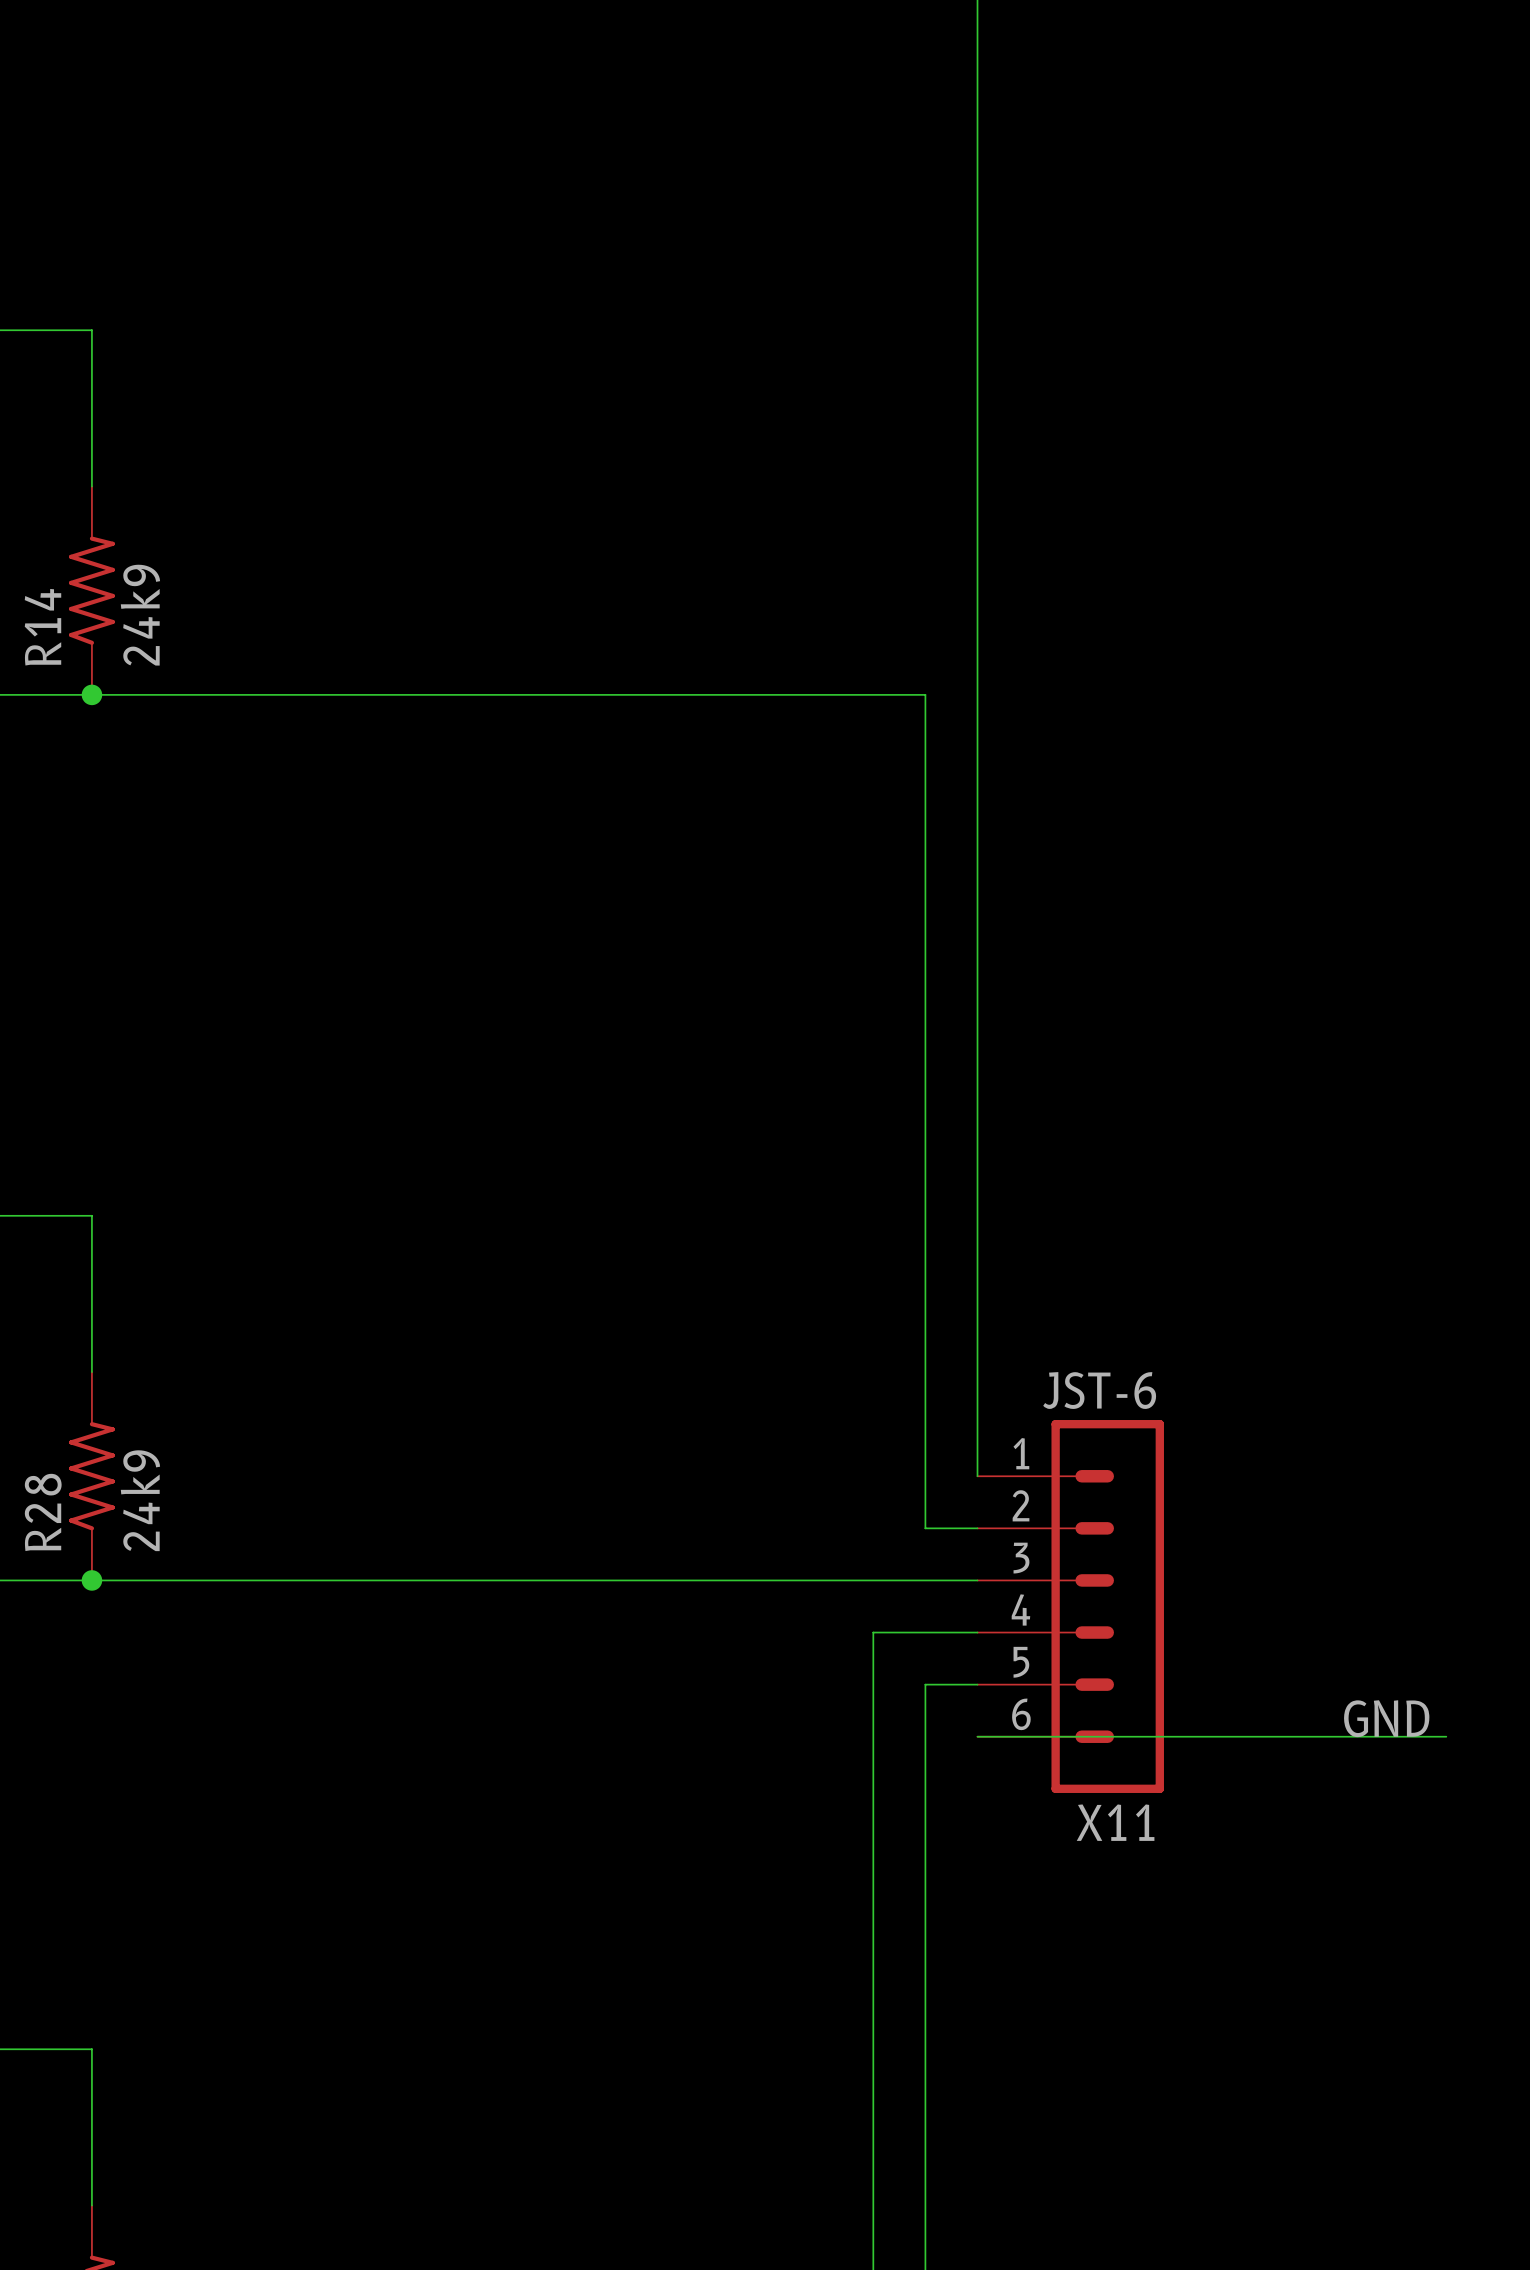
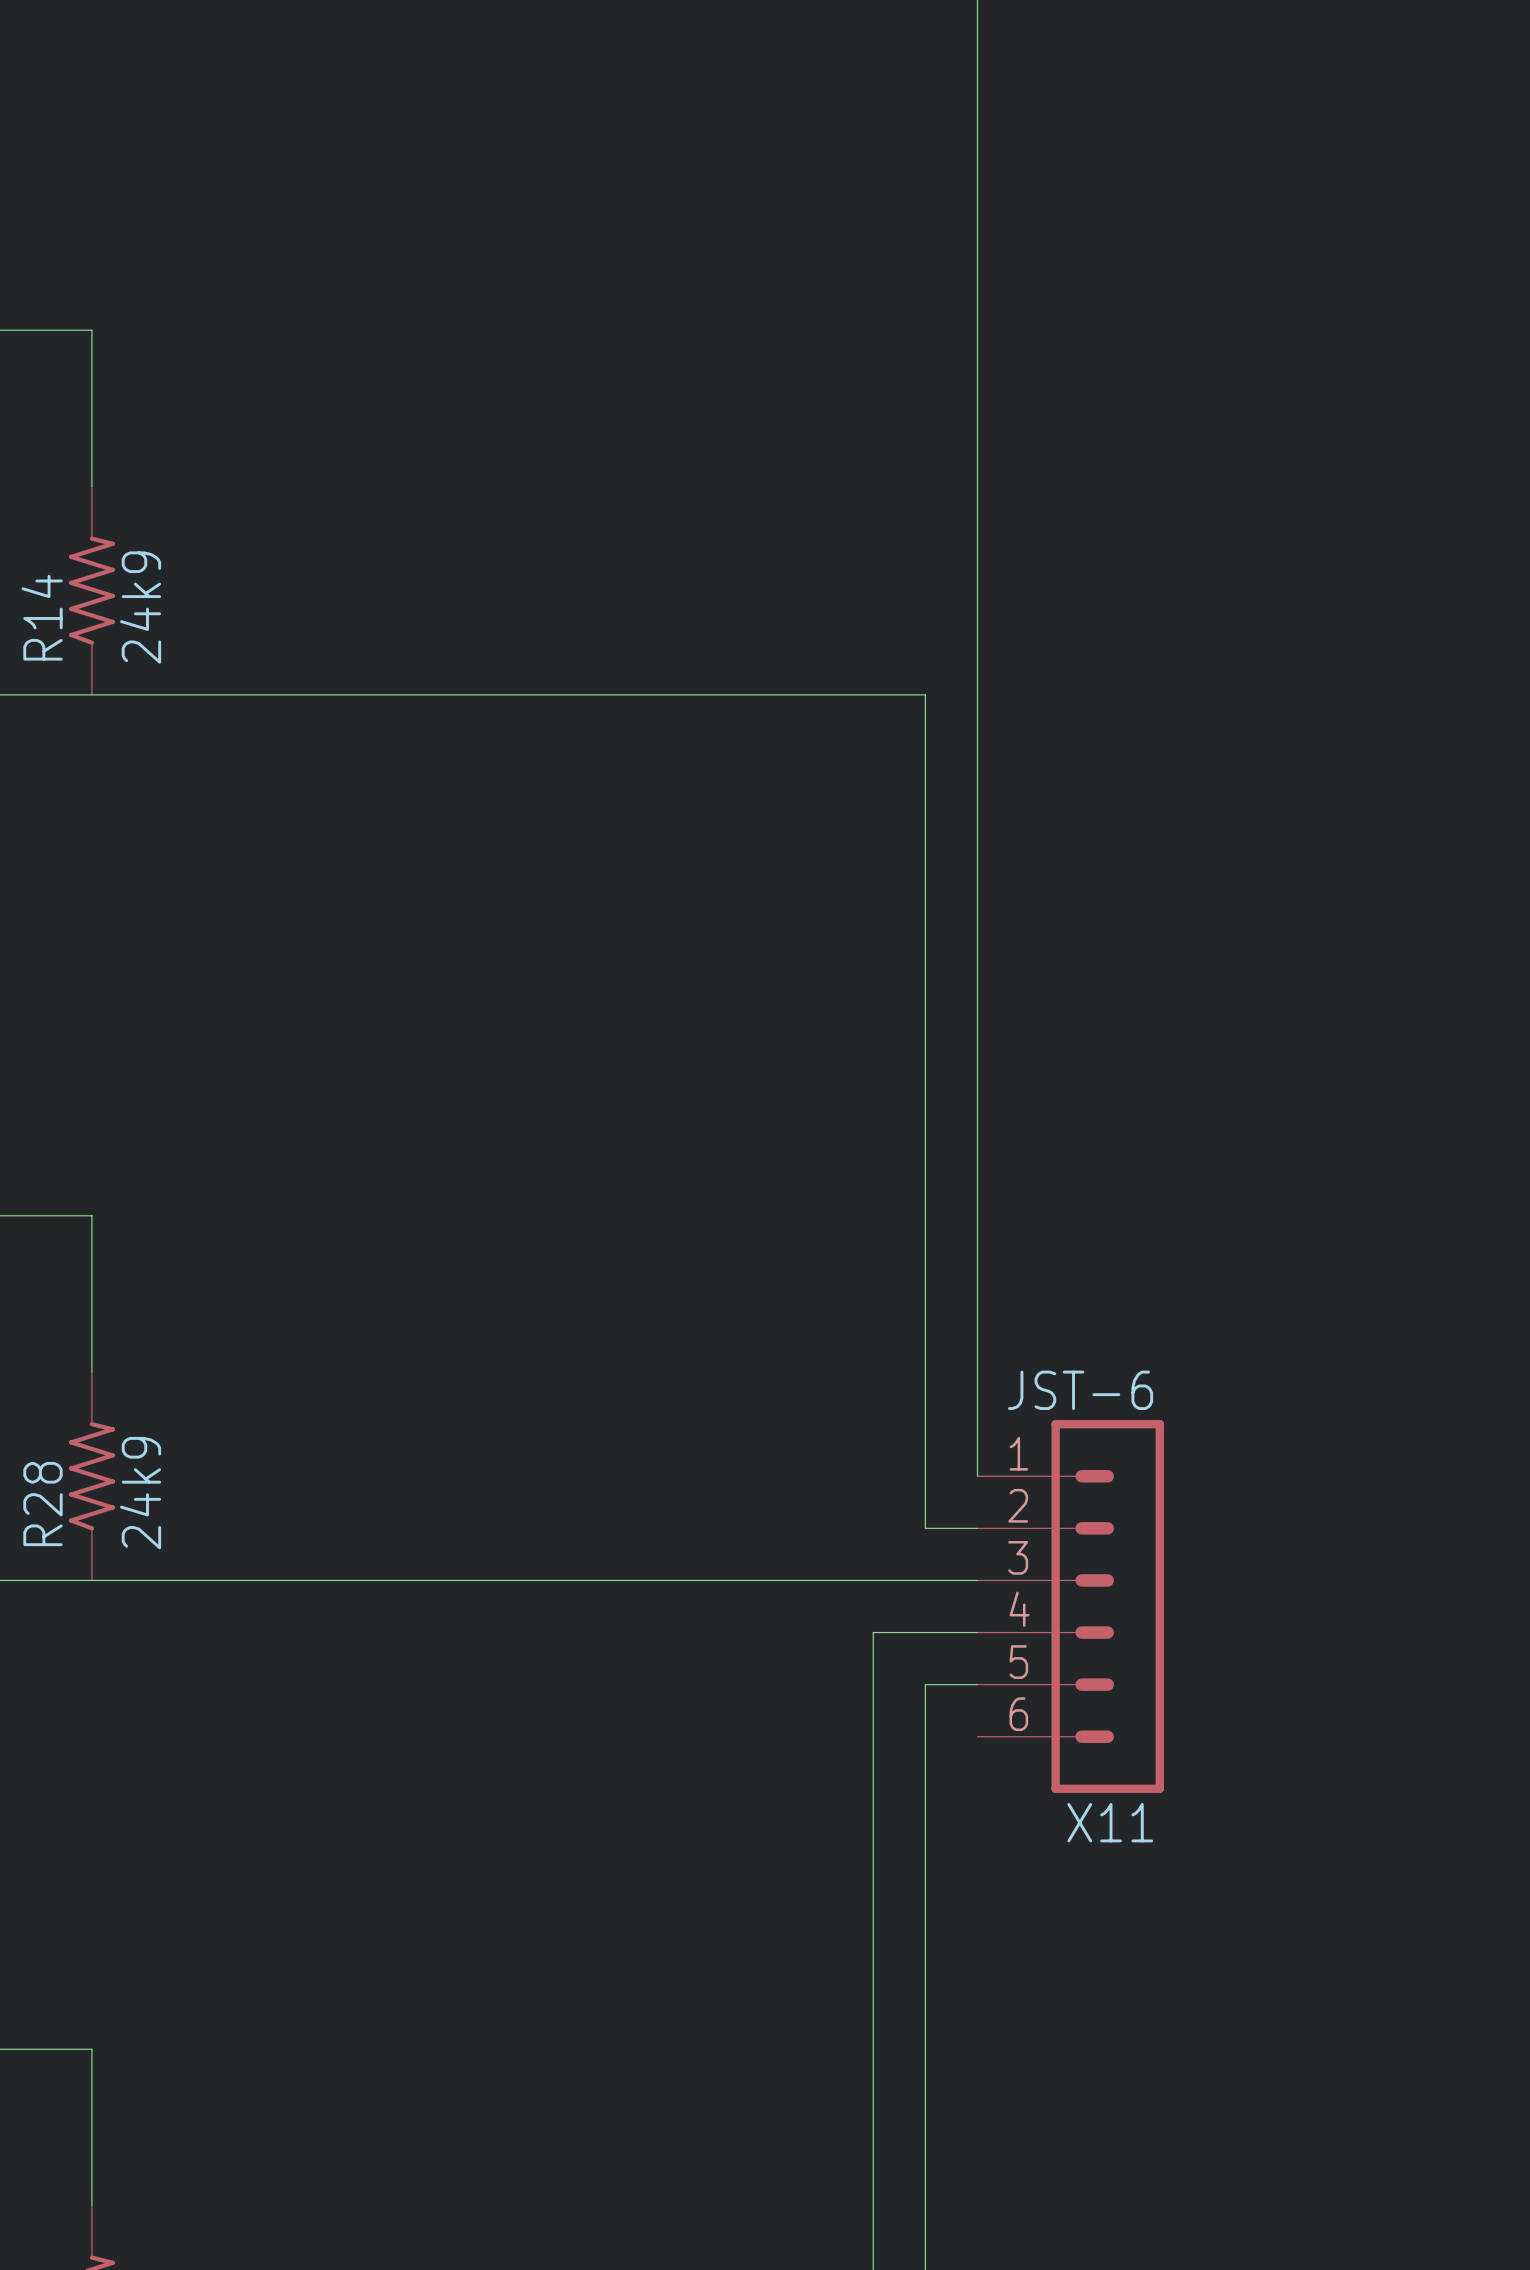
junction: (91, 694) -> none
junction: (91, 1580) -> none
label: GND (1386, 1718) -> none
wire: (977, 1736) (1446, 1736) -> none

